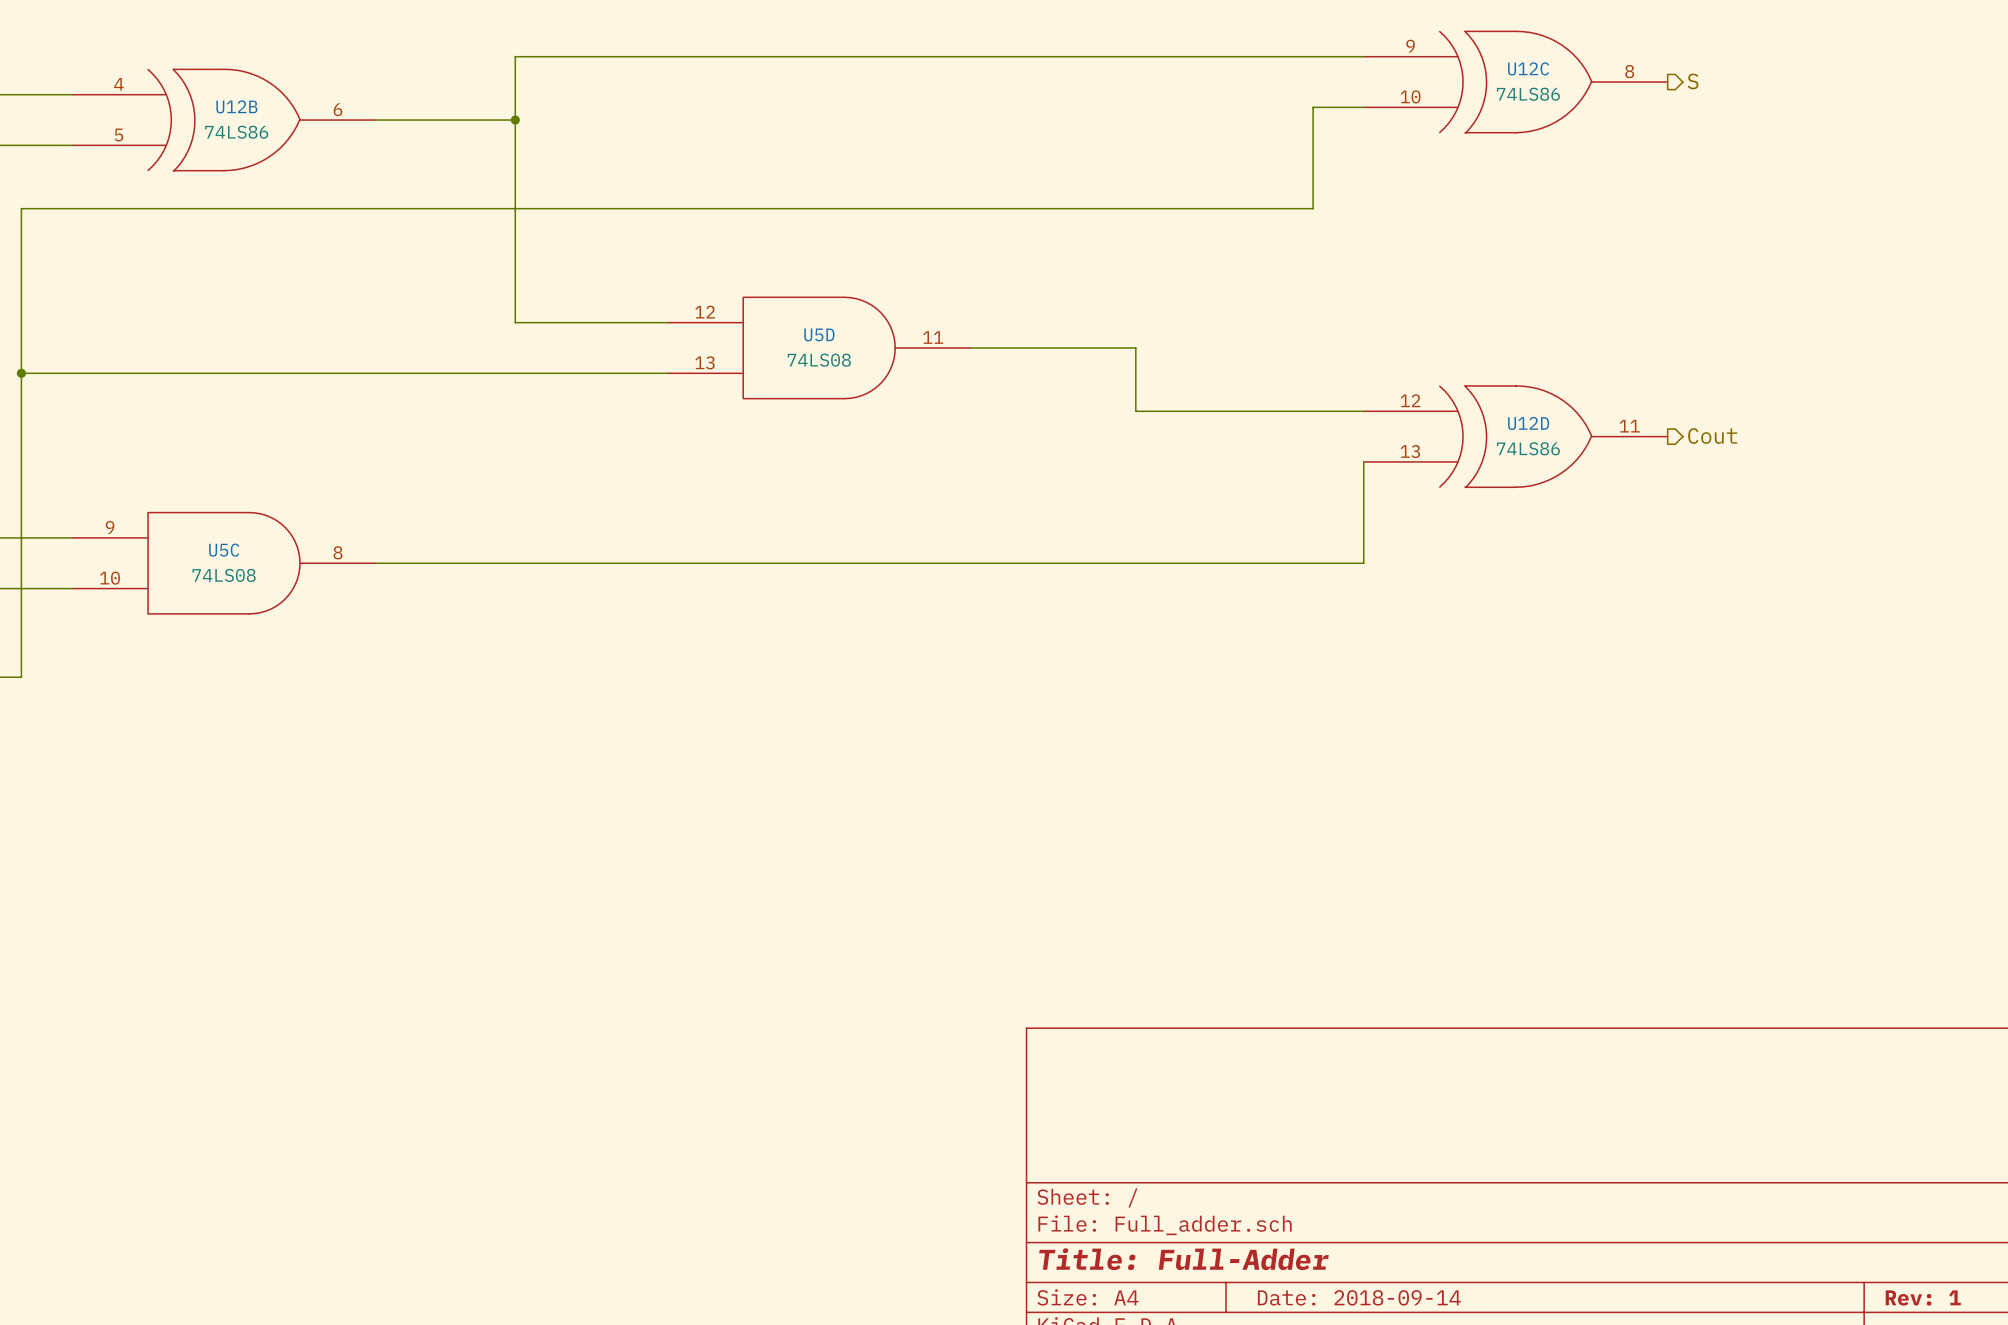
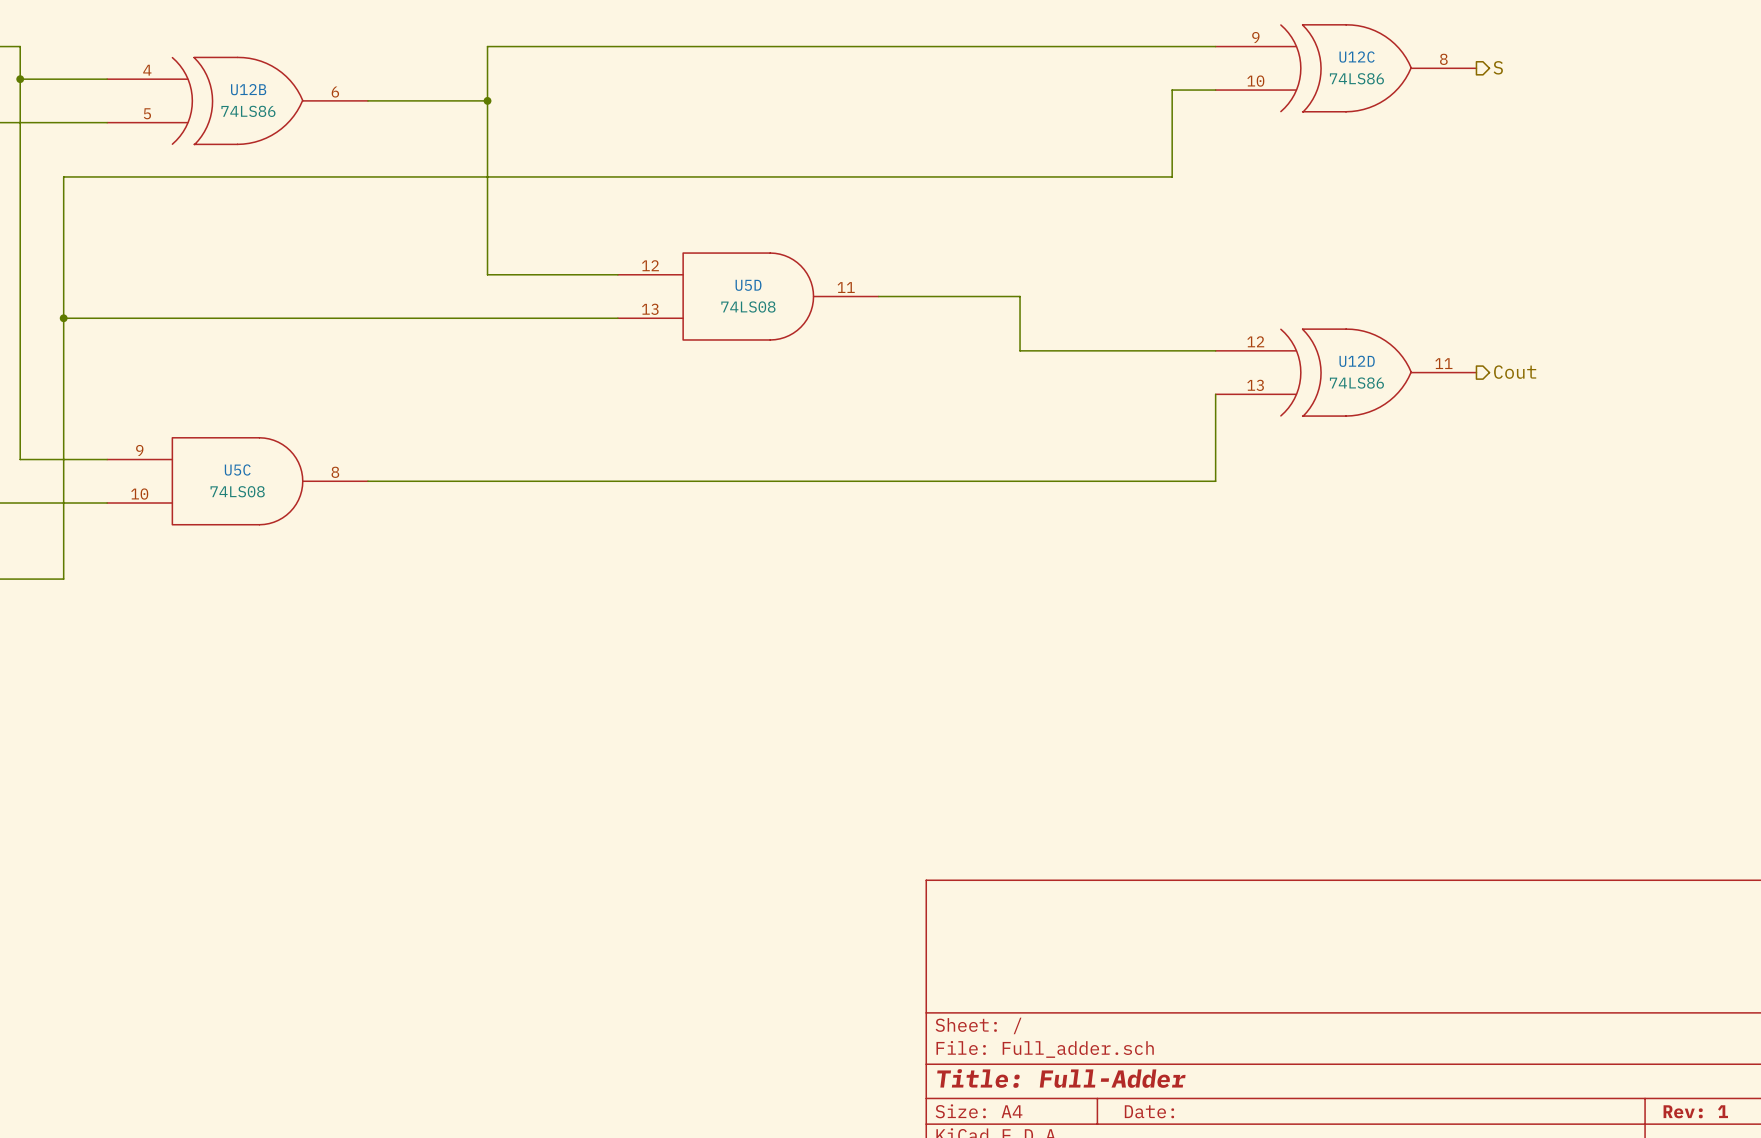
title block: Date: 2018-09-14 (1359, 1297) -> Date: (1149, 1111)

